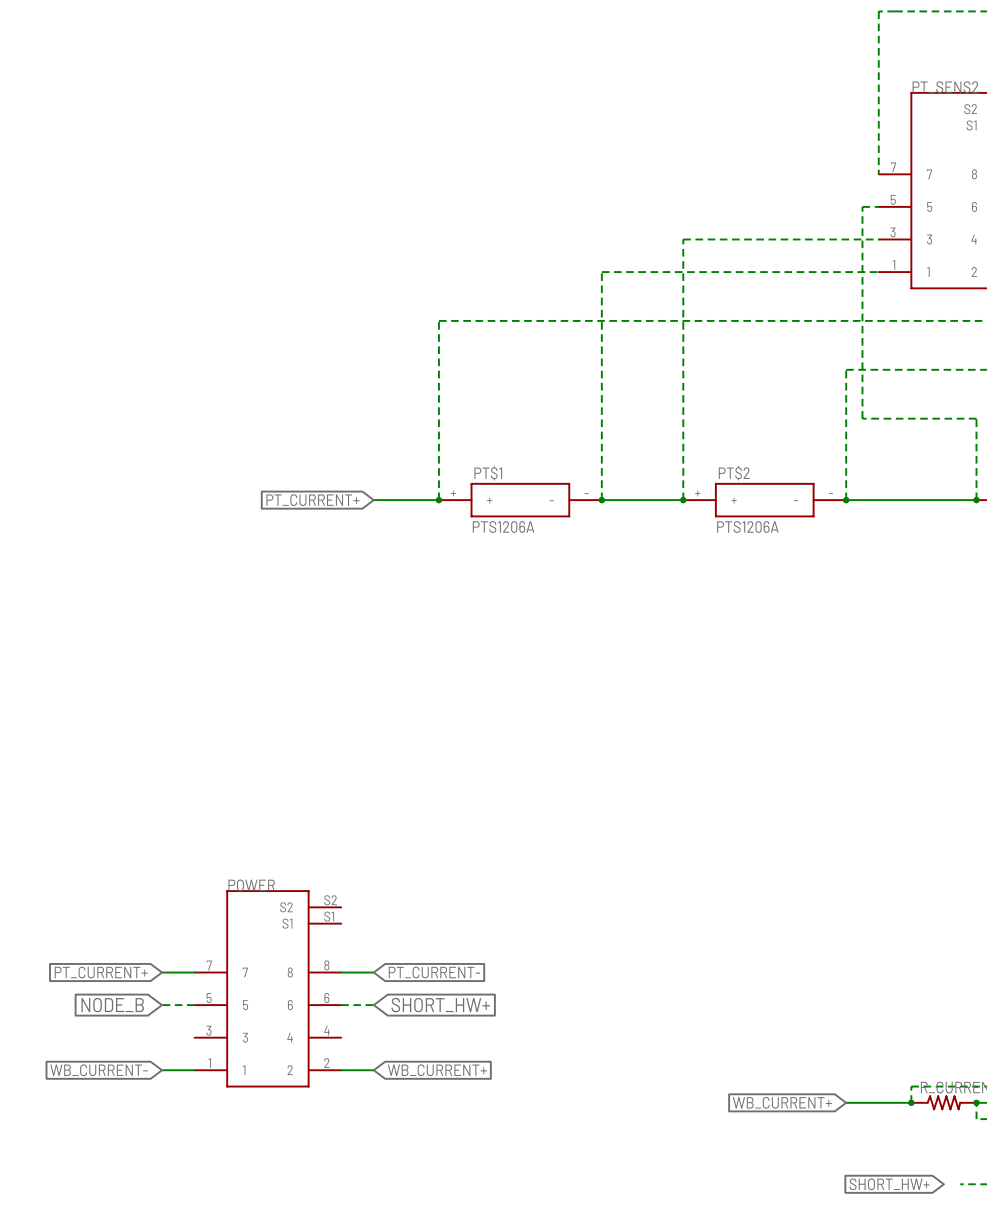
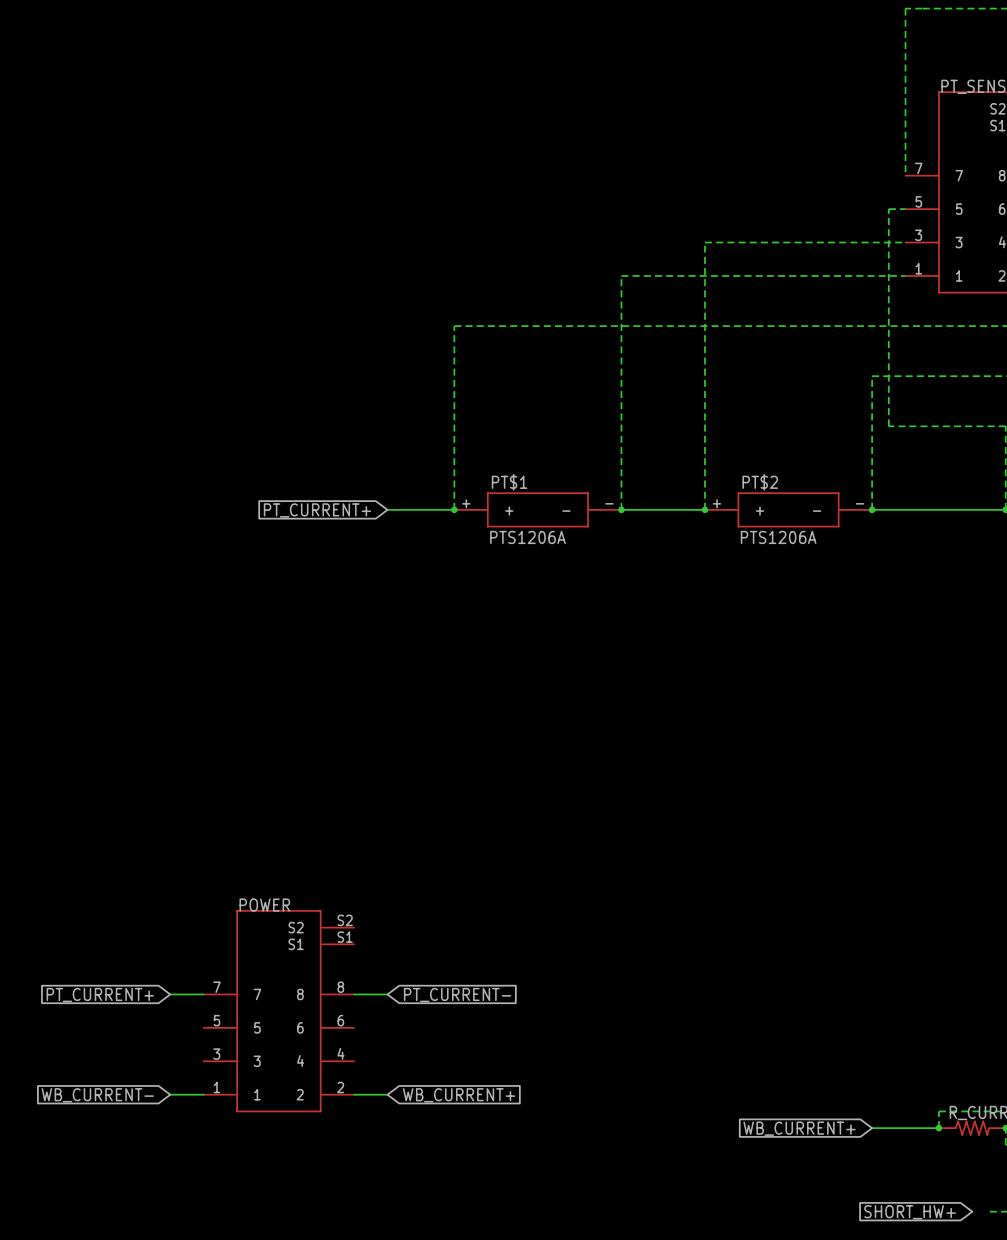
global label: NODE_B (112, 1005) -> none
wire: (162, 1005) (194, 1005) -> none
wire: (341, 1005) (373, 1005) -> none
global label: SHORT_HW+ (440, 1005) -> none

